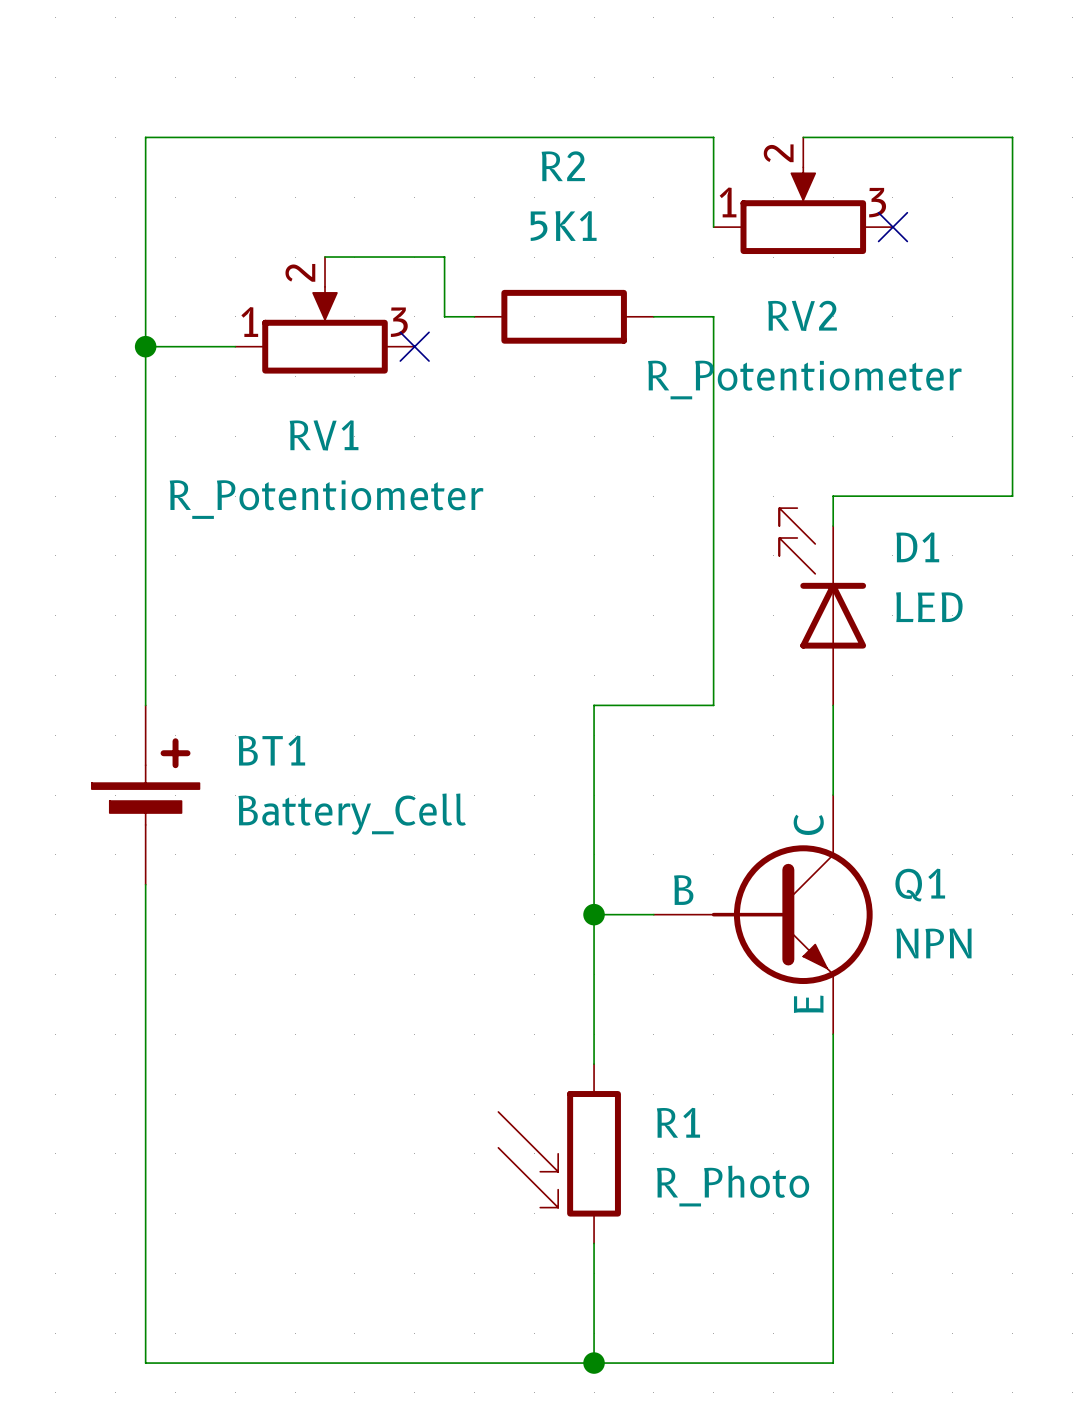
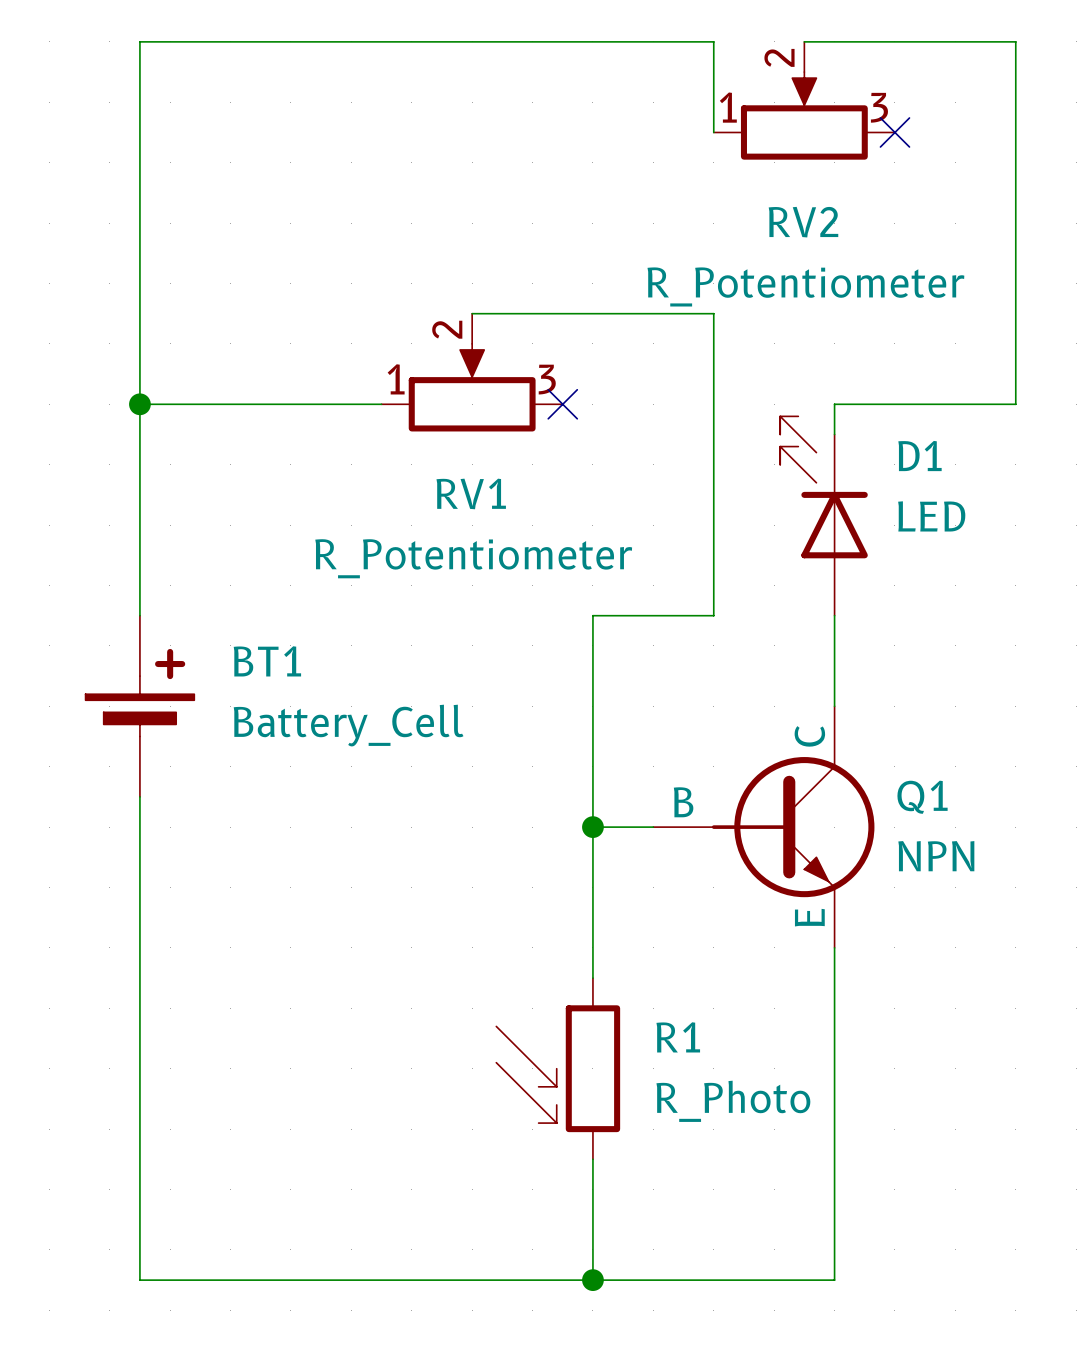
wire: (325, 257) (444, 257) (444, 316) (474, 316) -> none
RV1 position: (325, 315) -> (472, 372)
R2: 5K1 (564, 316) -> none
wire: (653, 316) (713, 316) (713, 406) -> (472, 313) (713, 313)
wire: (145, 346) (235, 346) -> none
junction: (145, 346) -> none
no-connect mark: (414, 346) -> none
wire: none -> (139, 404) (381, 404)
junction: none -> (139, 404)
no-connect mark: none -> (562, 404)

